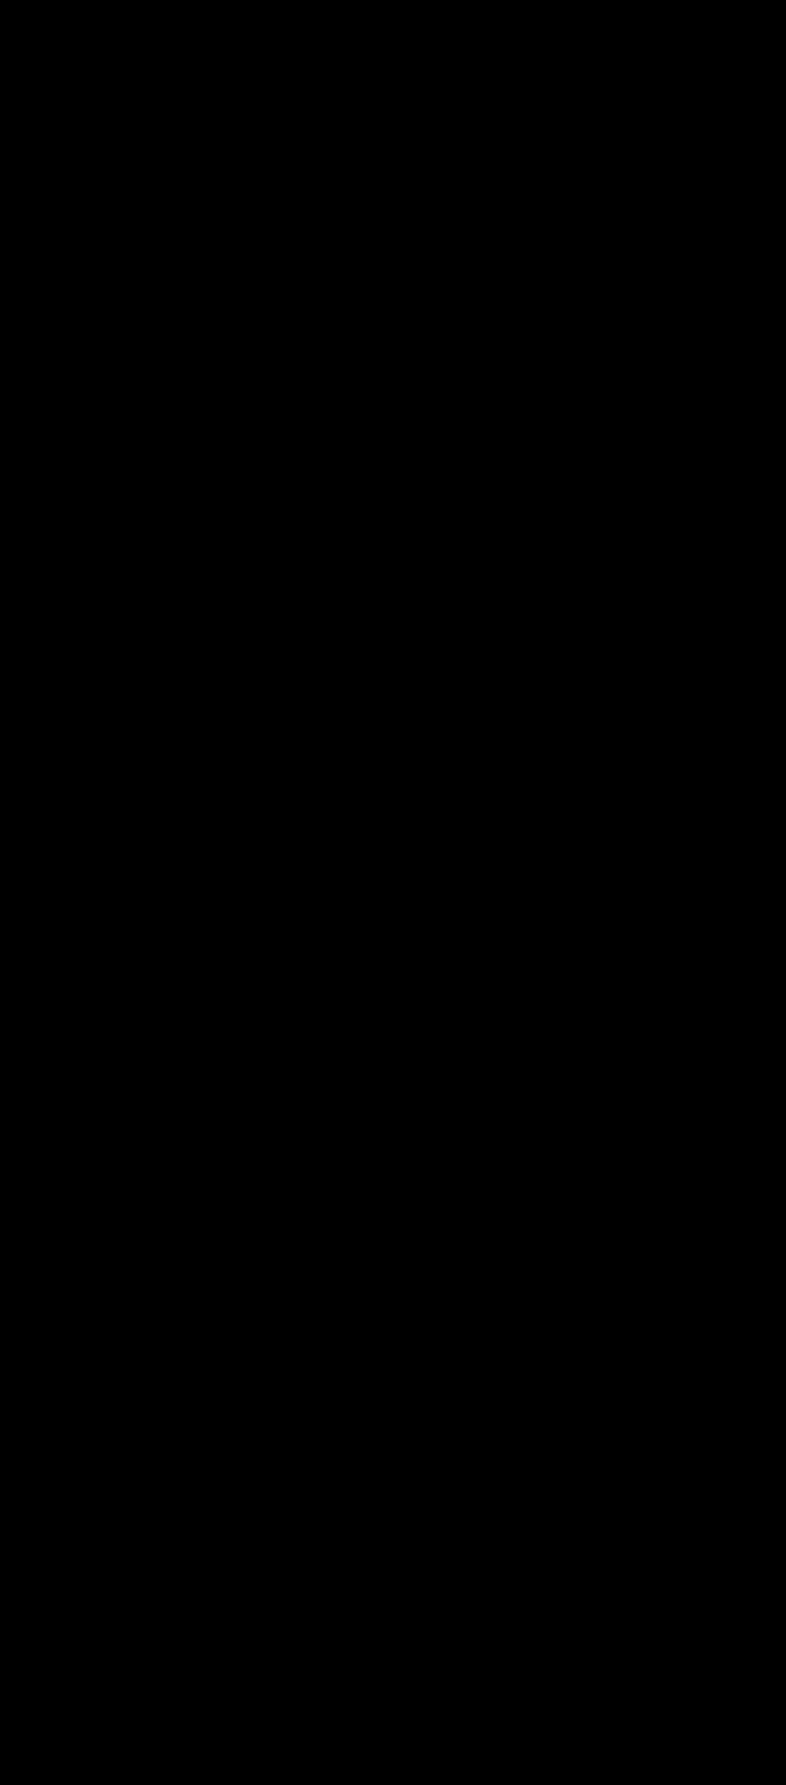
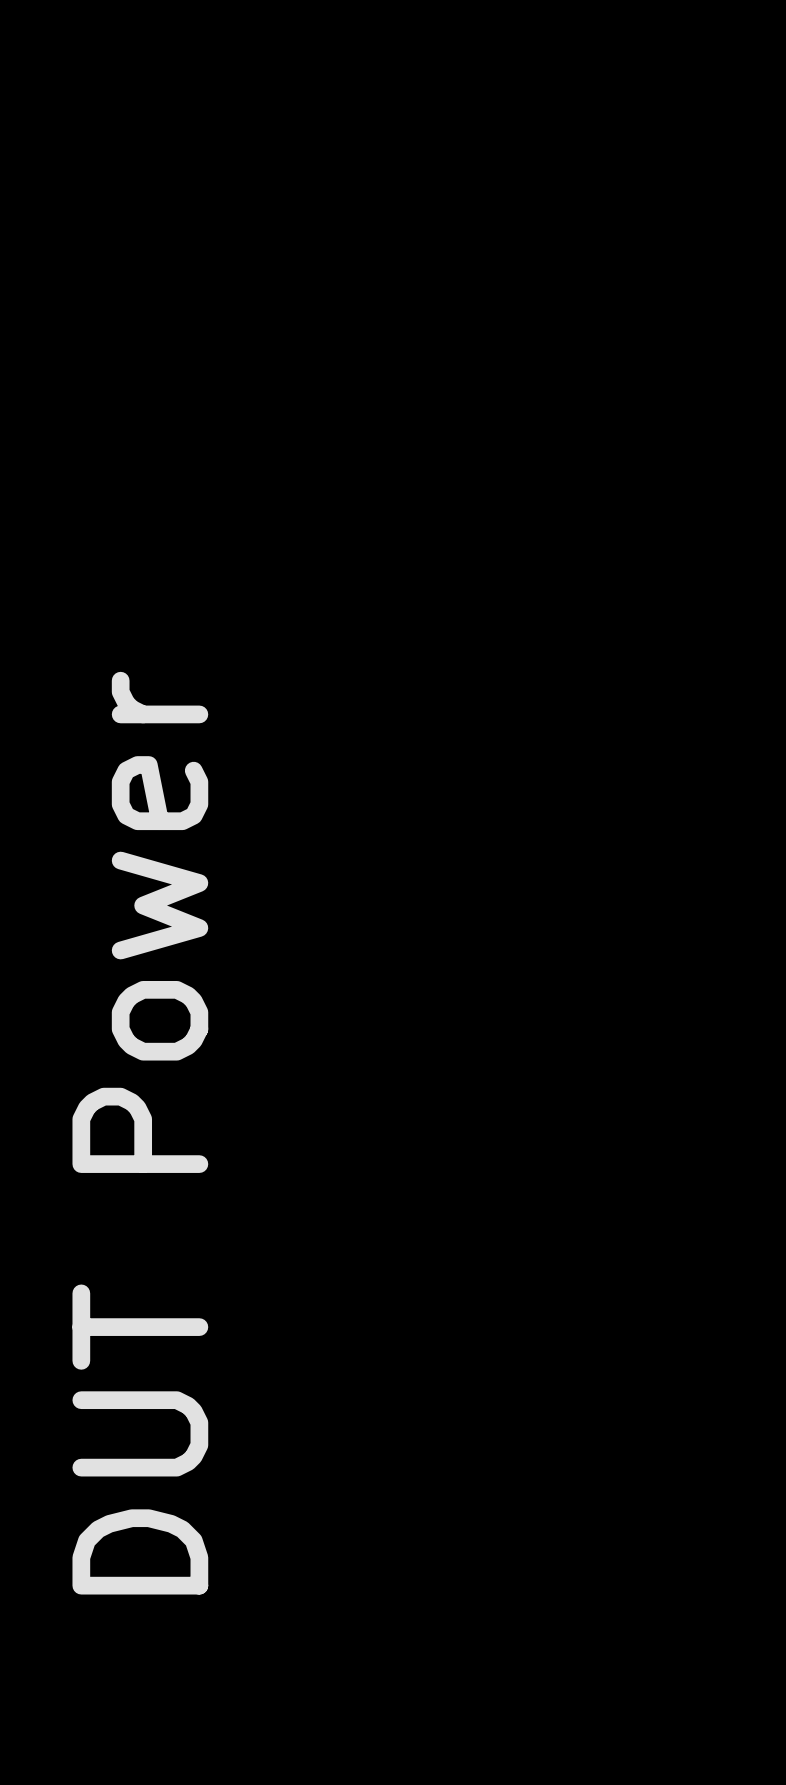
text: none -> DUT Power (140, 1133)

